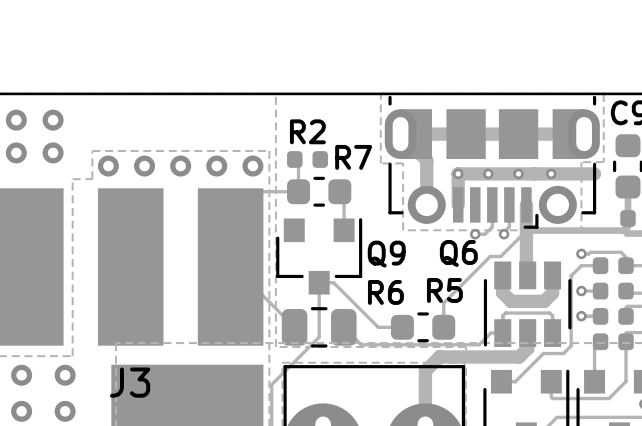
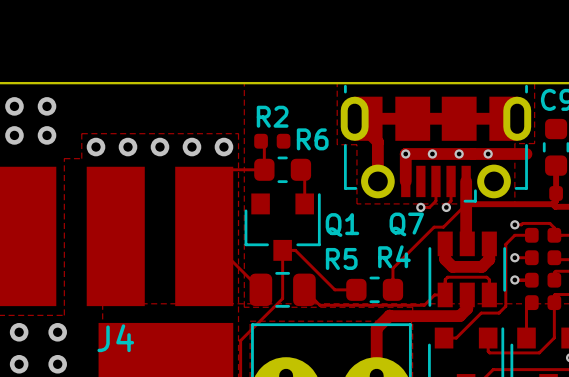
R7 name: R7 (353, 157) -> R6 (312, 139)
Q6 name: Q6 (458, 253) -> Q7 (406, 224)
Q9 name: Q9 (386, 254) -> Q1 (342, 225)
R5 name: R5 (444, 290) -> R4 (394, 256)
R6 name: R6 (385, 292) -> R5 (341, 258)
J3 name: J3 (130, 382) -> J4 (115, 338)

